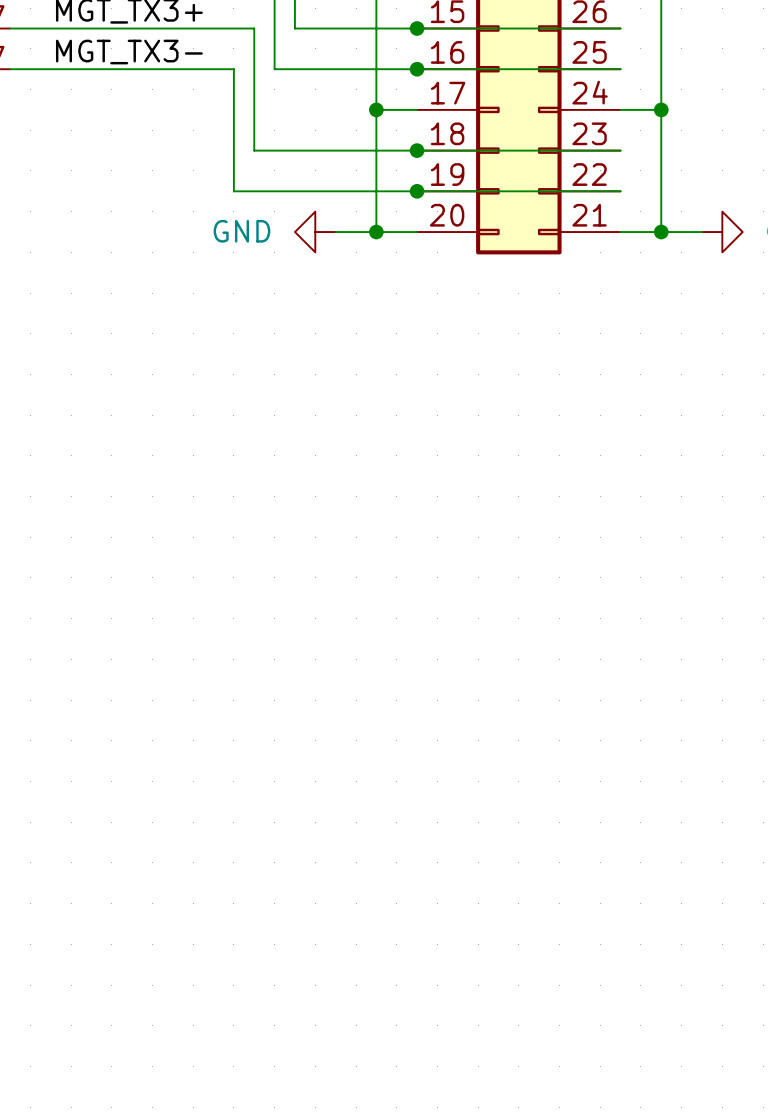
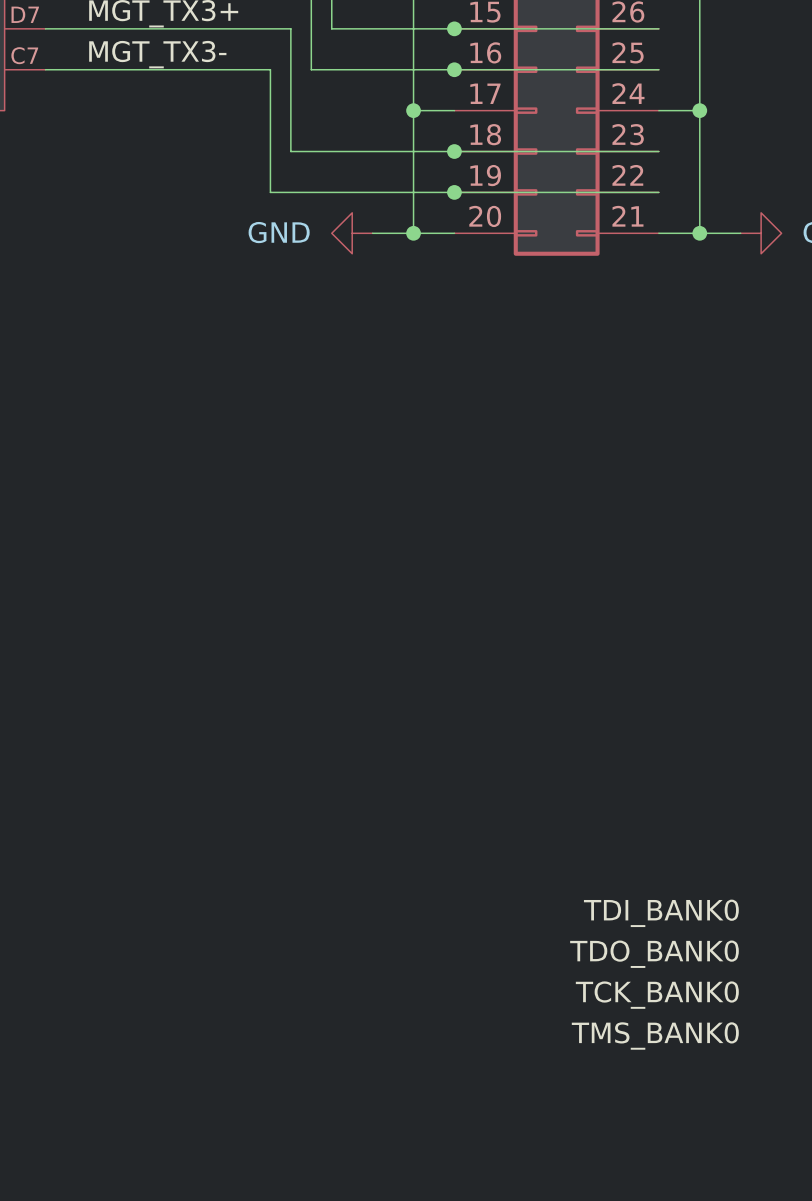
label: none -> TDI_BANK0 (661, 913)
label: none -> TDO_BANK0 (654, 954)
label: none -> TCK_BANK0 (657, 995)
label: none -> TMS_BANK0 (655, 1036)

